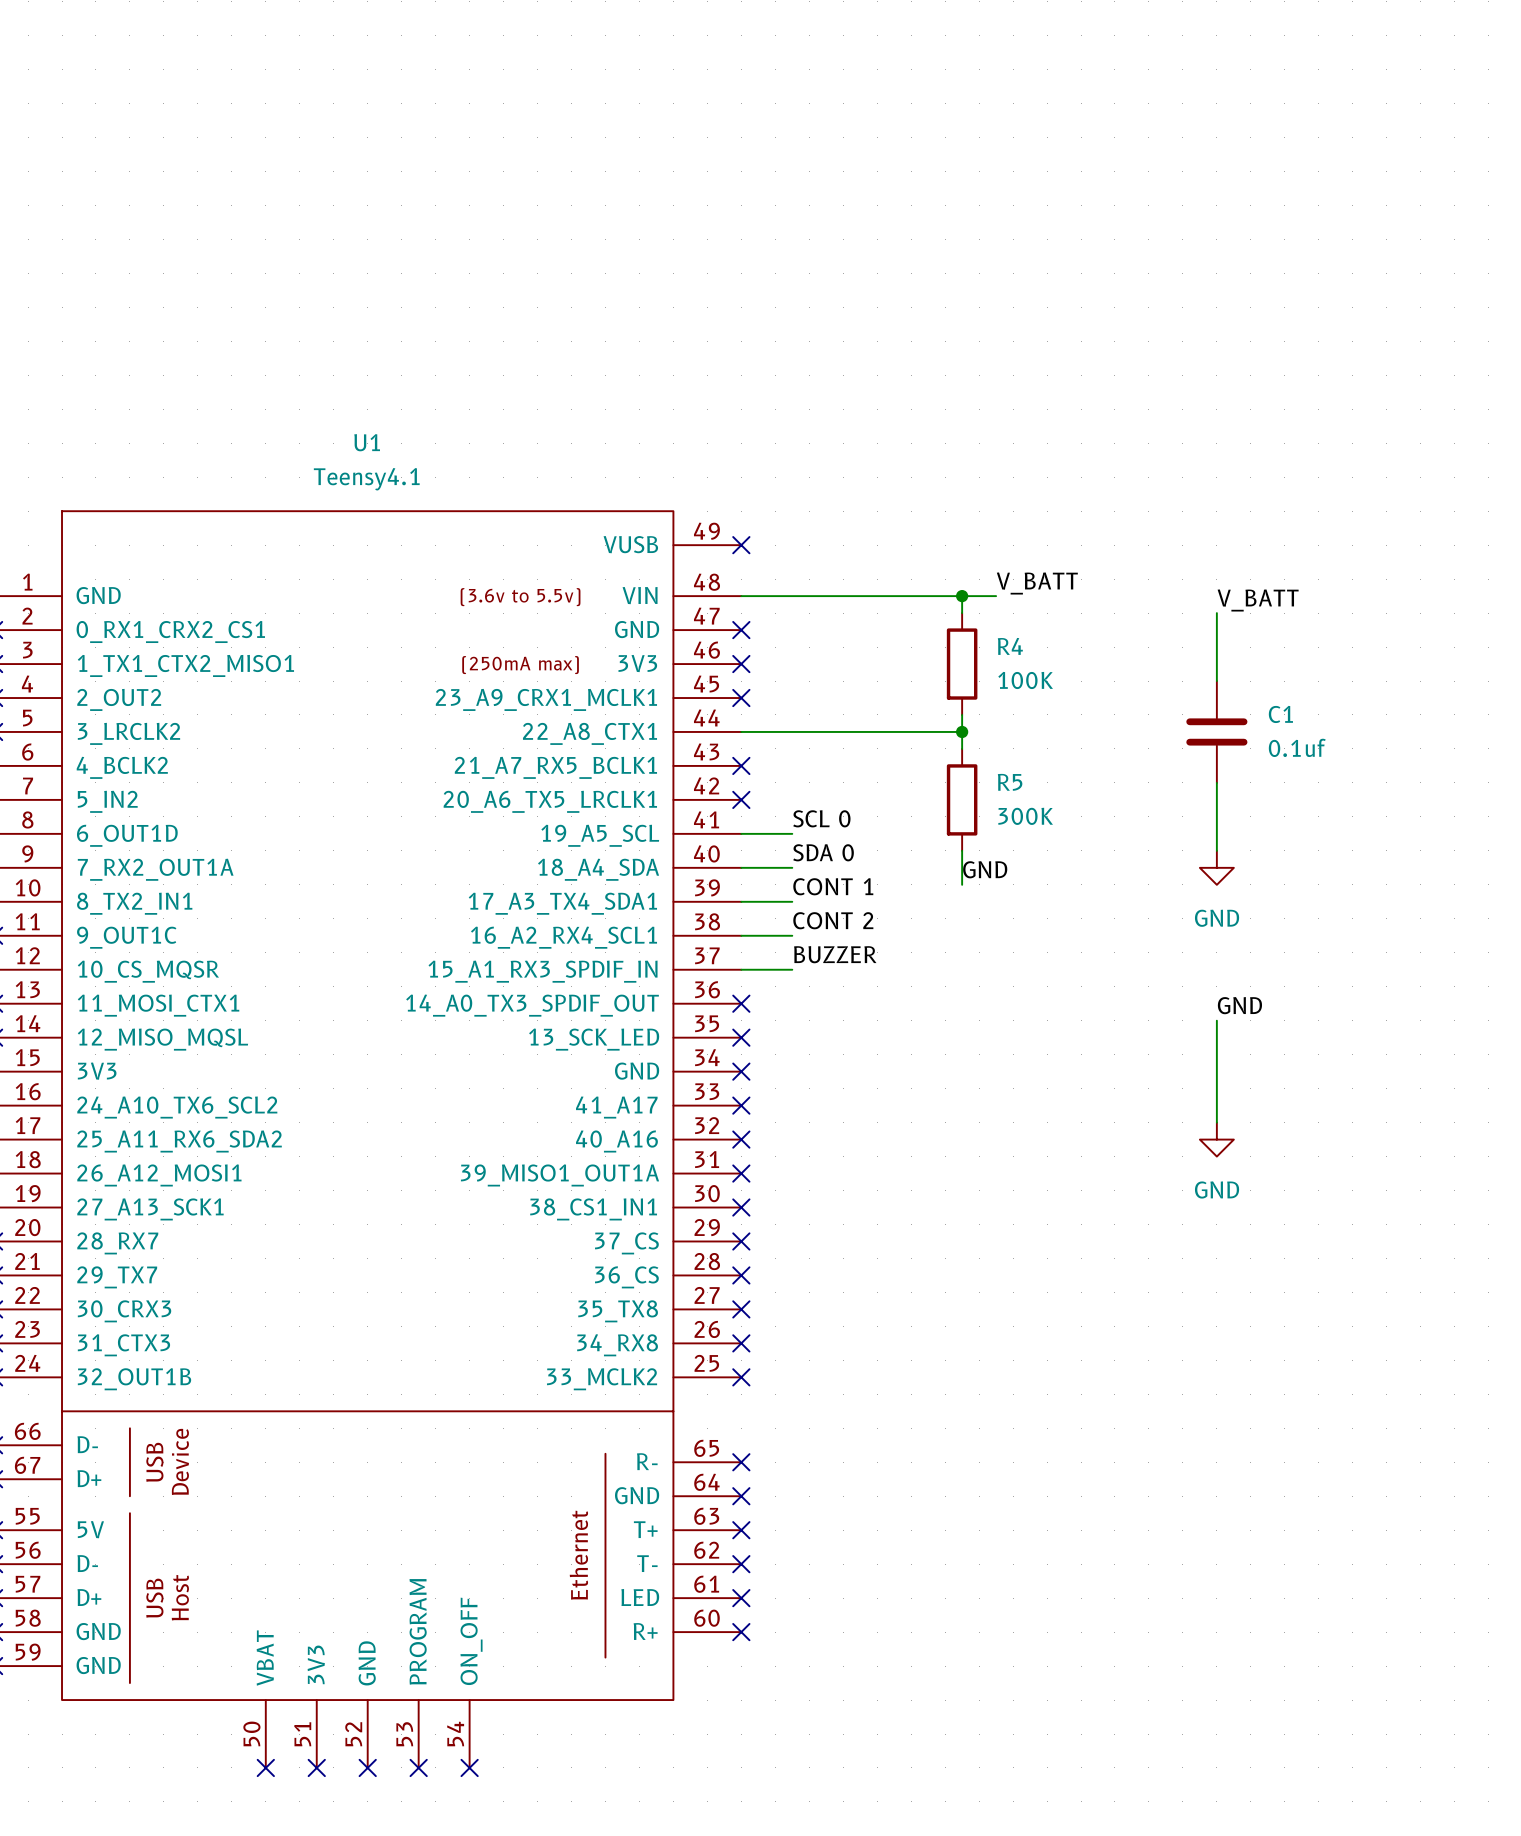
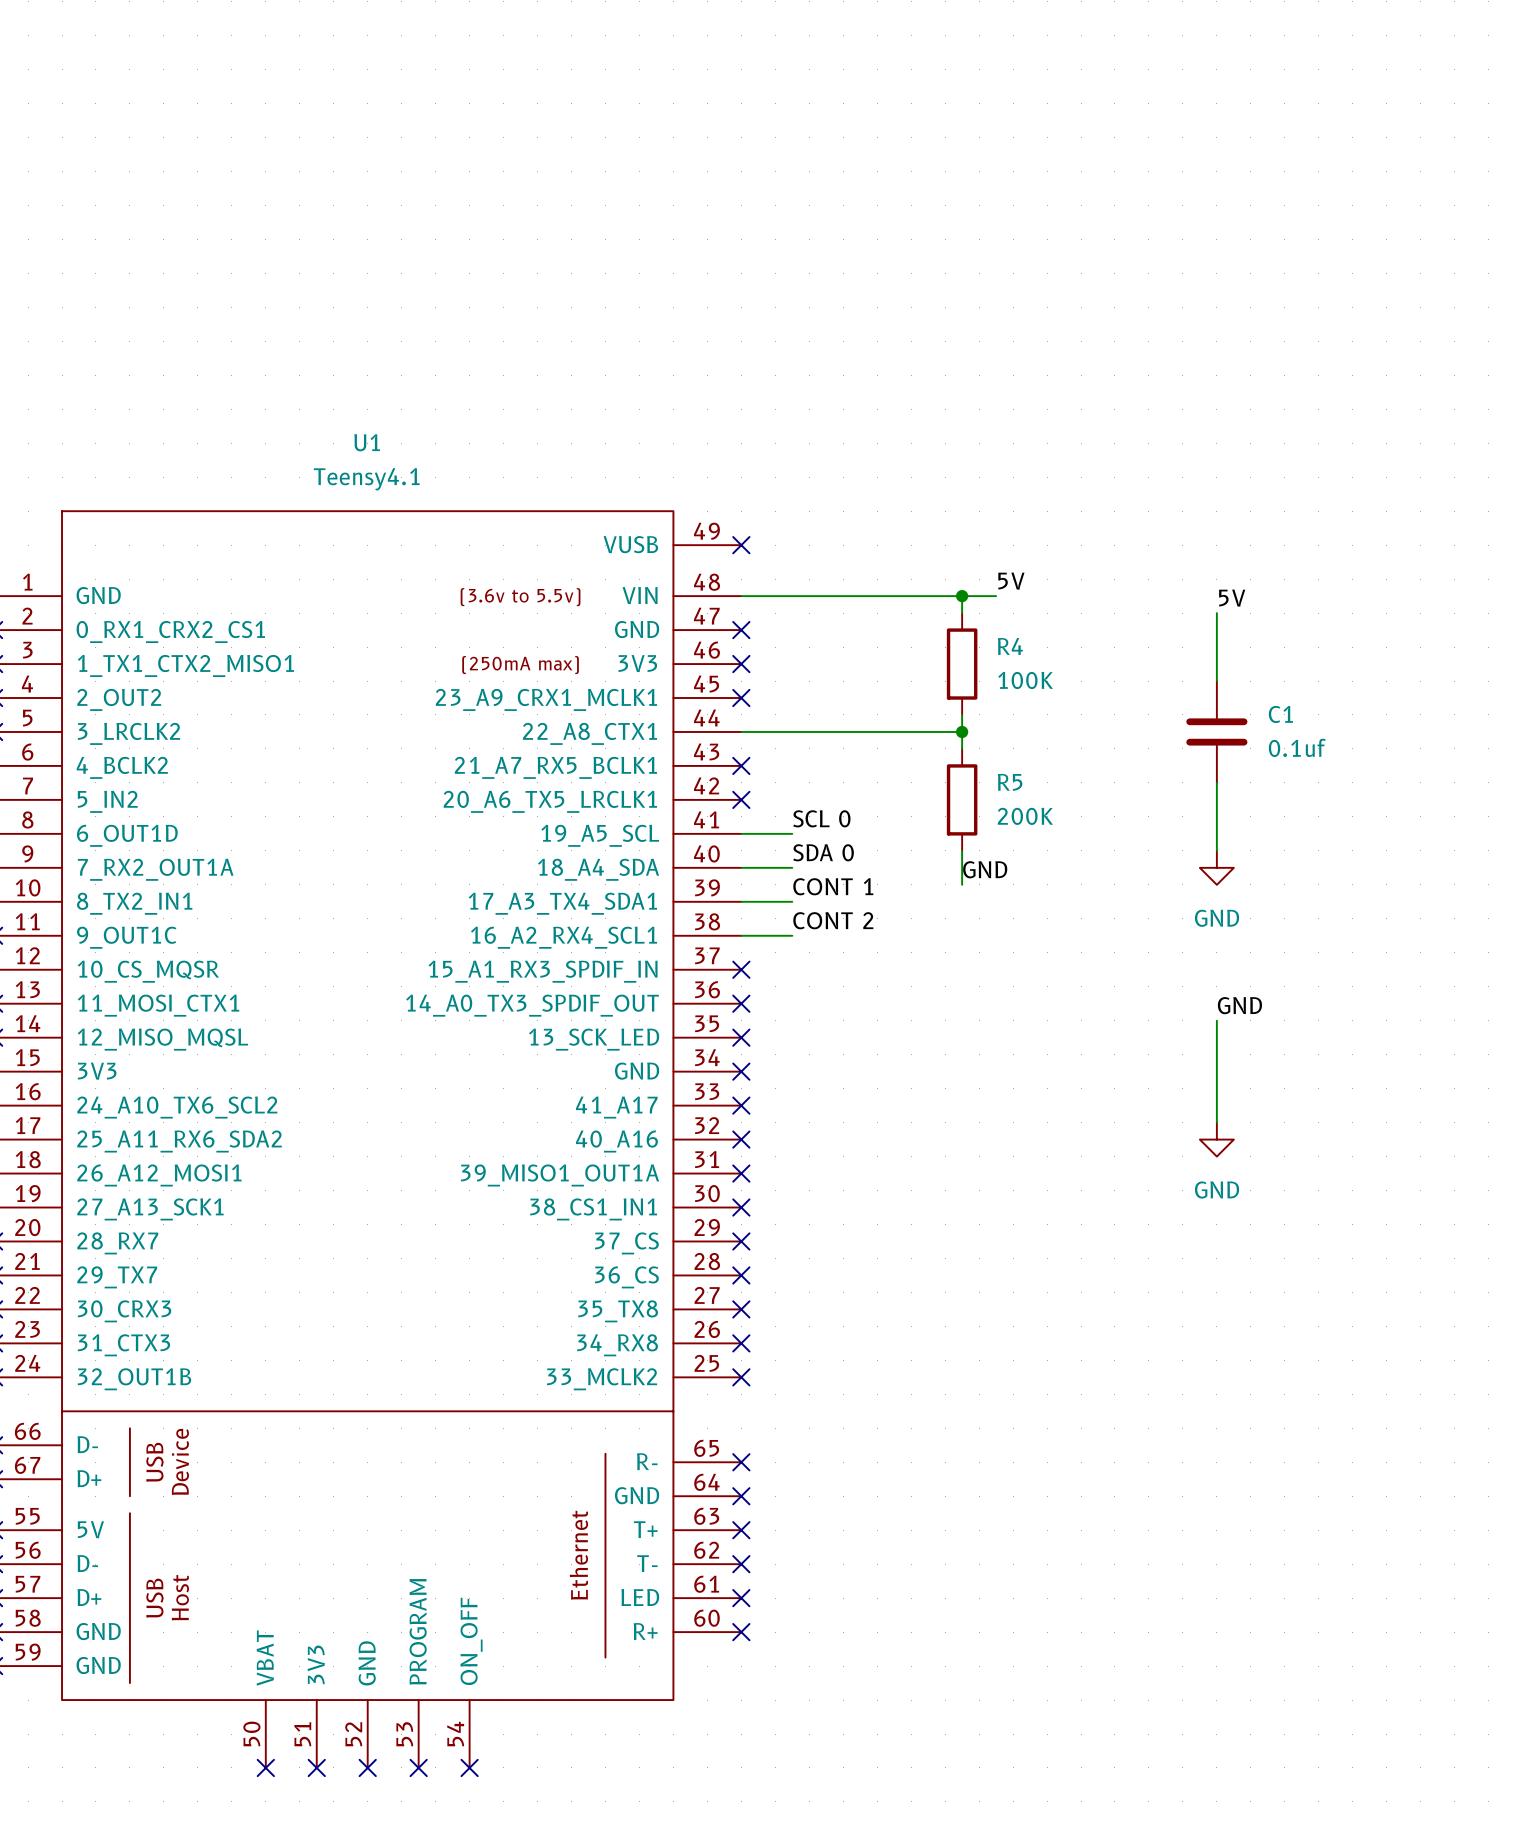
label: V_BATT (1037, 583) -> 5V (1011, 581)
label: V_BATT (1258, 600) -> 5V (1232, 598)
R5 value: 300K (1025, 816) -> 200K (1025, 816)
label: BUZZER (835, 954) -> none
wire: (741, 969) (792, 969) -> none
no-connect mark: none -> (741, 969)

